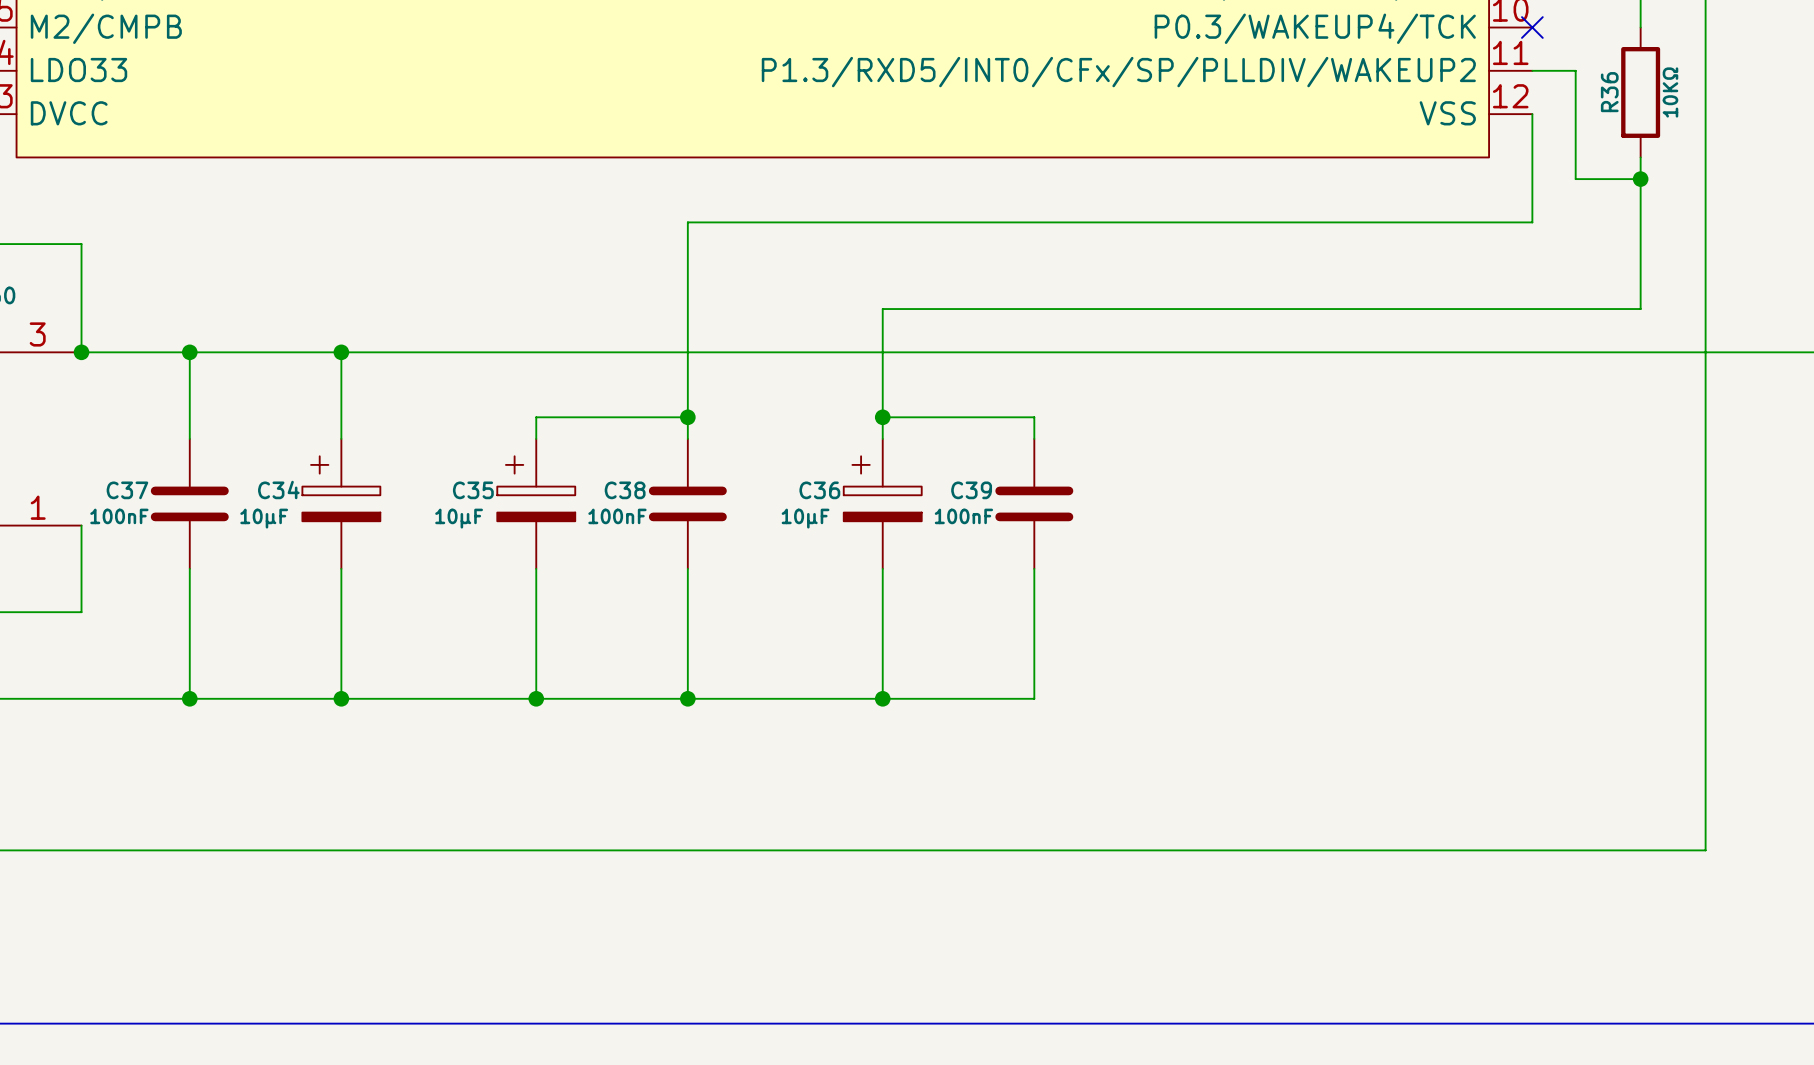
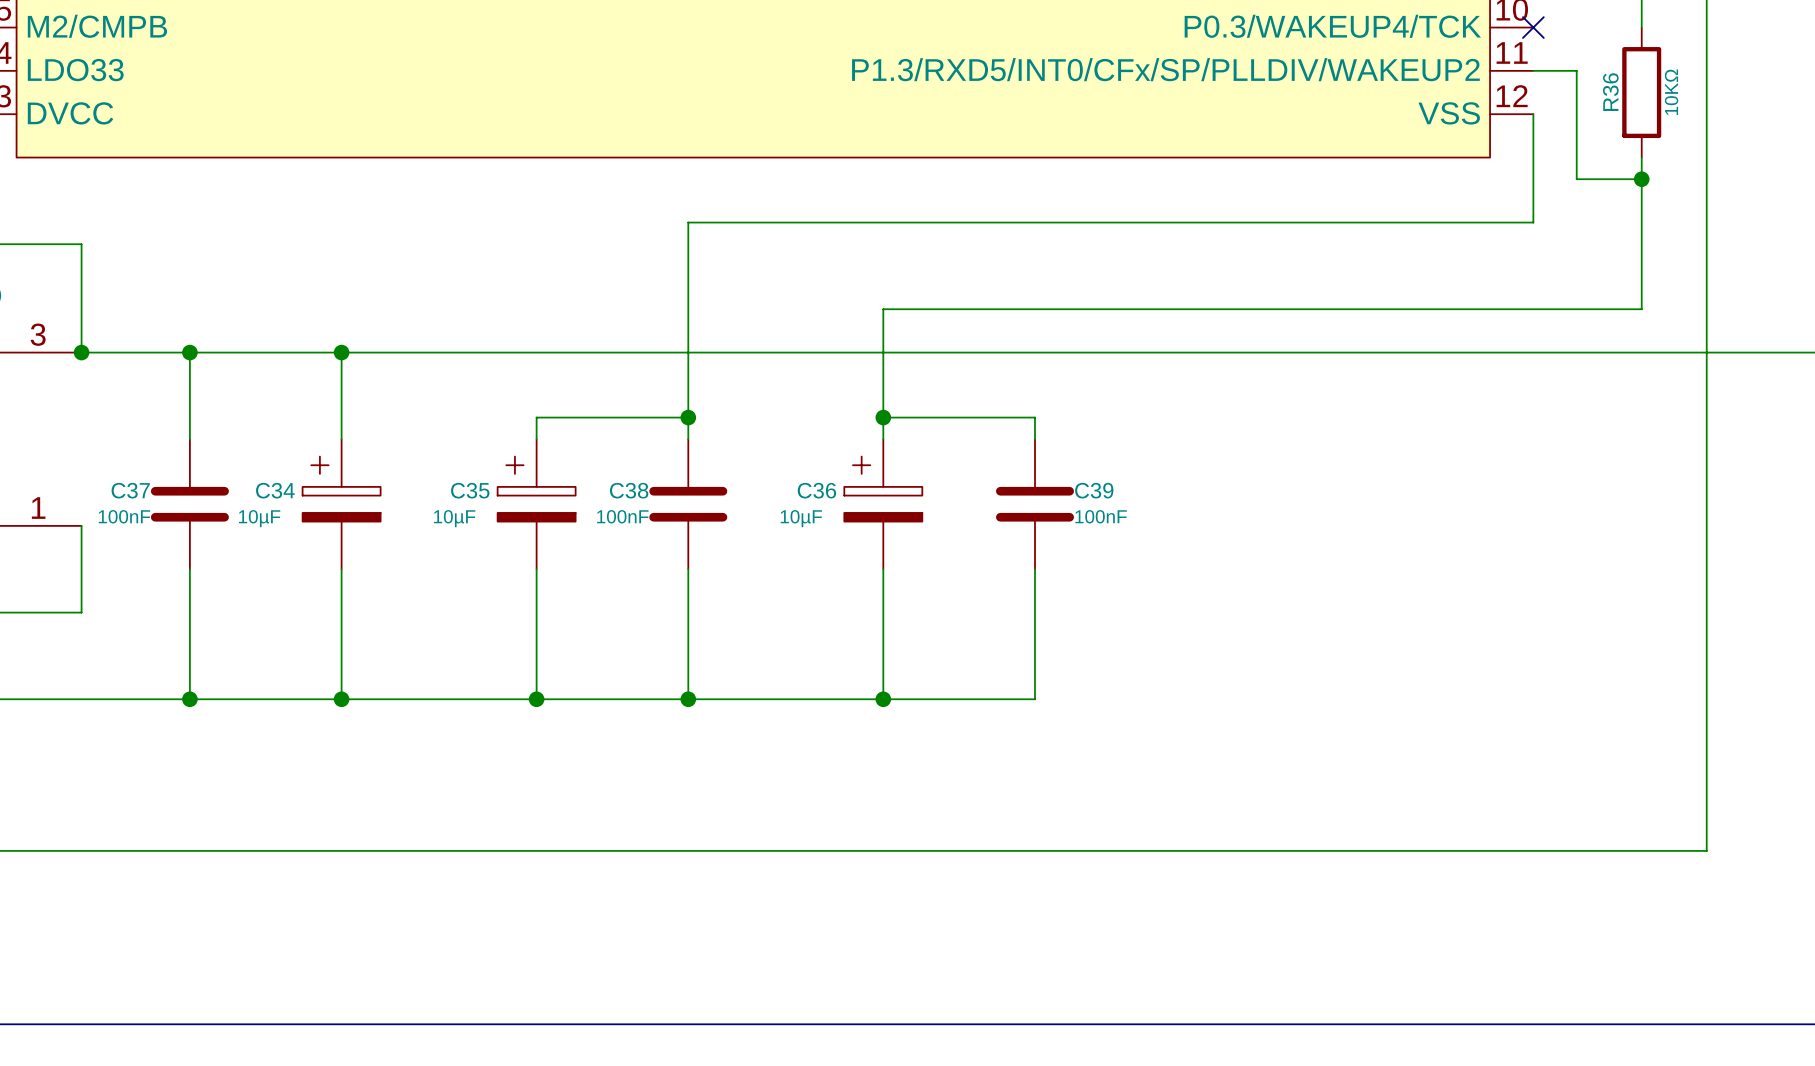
C39 name position: C39 (971, 490) -> C39 (1094, 490)
C39 value position: 100nF (963, 516) -> 100nF (1101, 516)

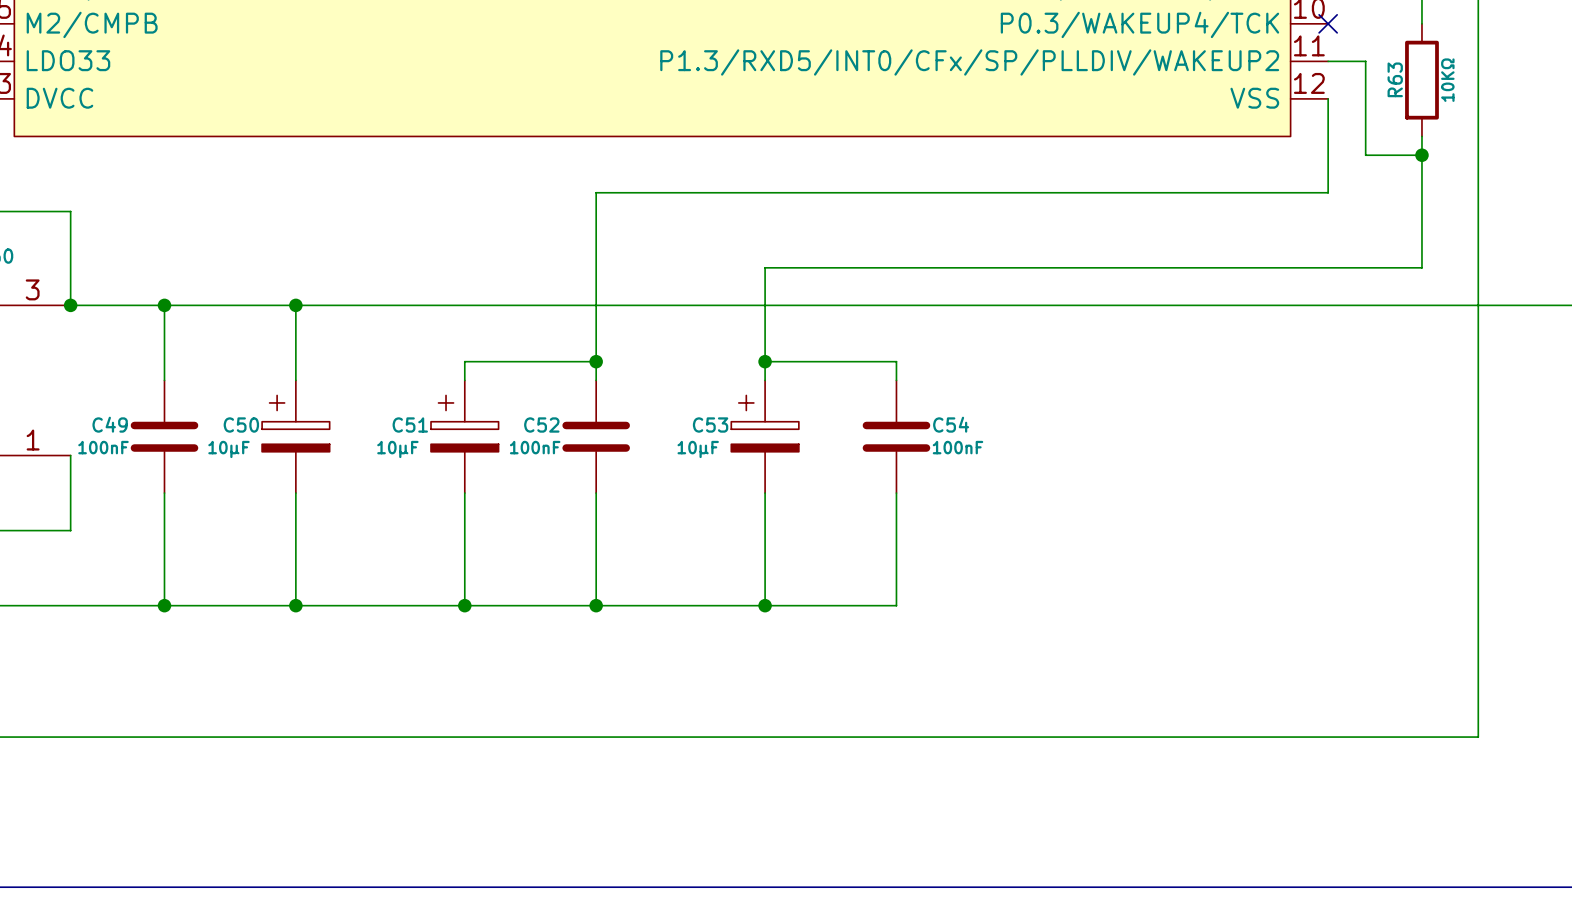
R36 name: R36 (1610, 92) -> R63 (1395, 79)
C37 name: C37 (130, 490) -> C49 (110, 424)
C34 name: C34 (275, 490) -> C50 (241, 425)
C35 name: C35 (470, 490) -> C51 (410, 425)
C38 name: C38 (629, 490) -> C52 (541, 425)
C36 name: C36 (816, 490) -> C53 (710, 425)
C39 name: C39 (1094, 490) -> C54 (951, 424)

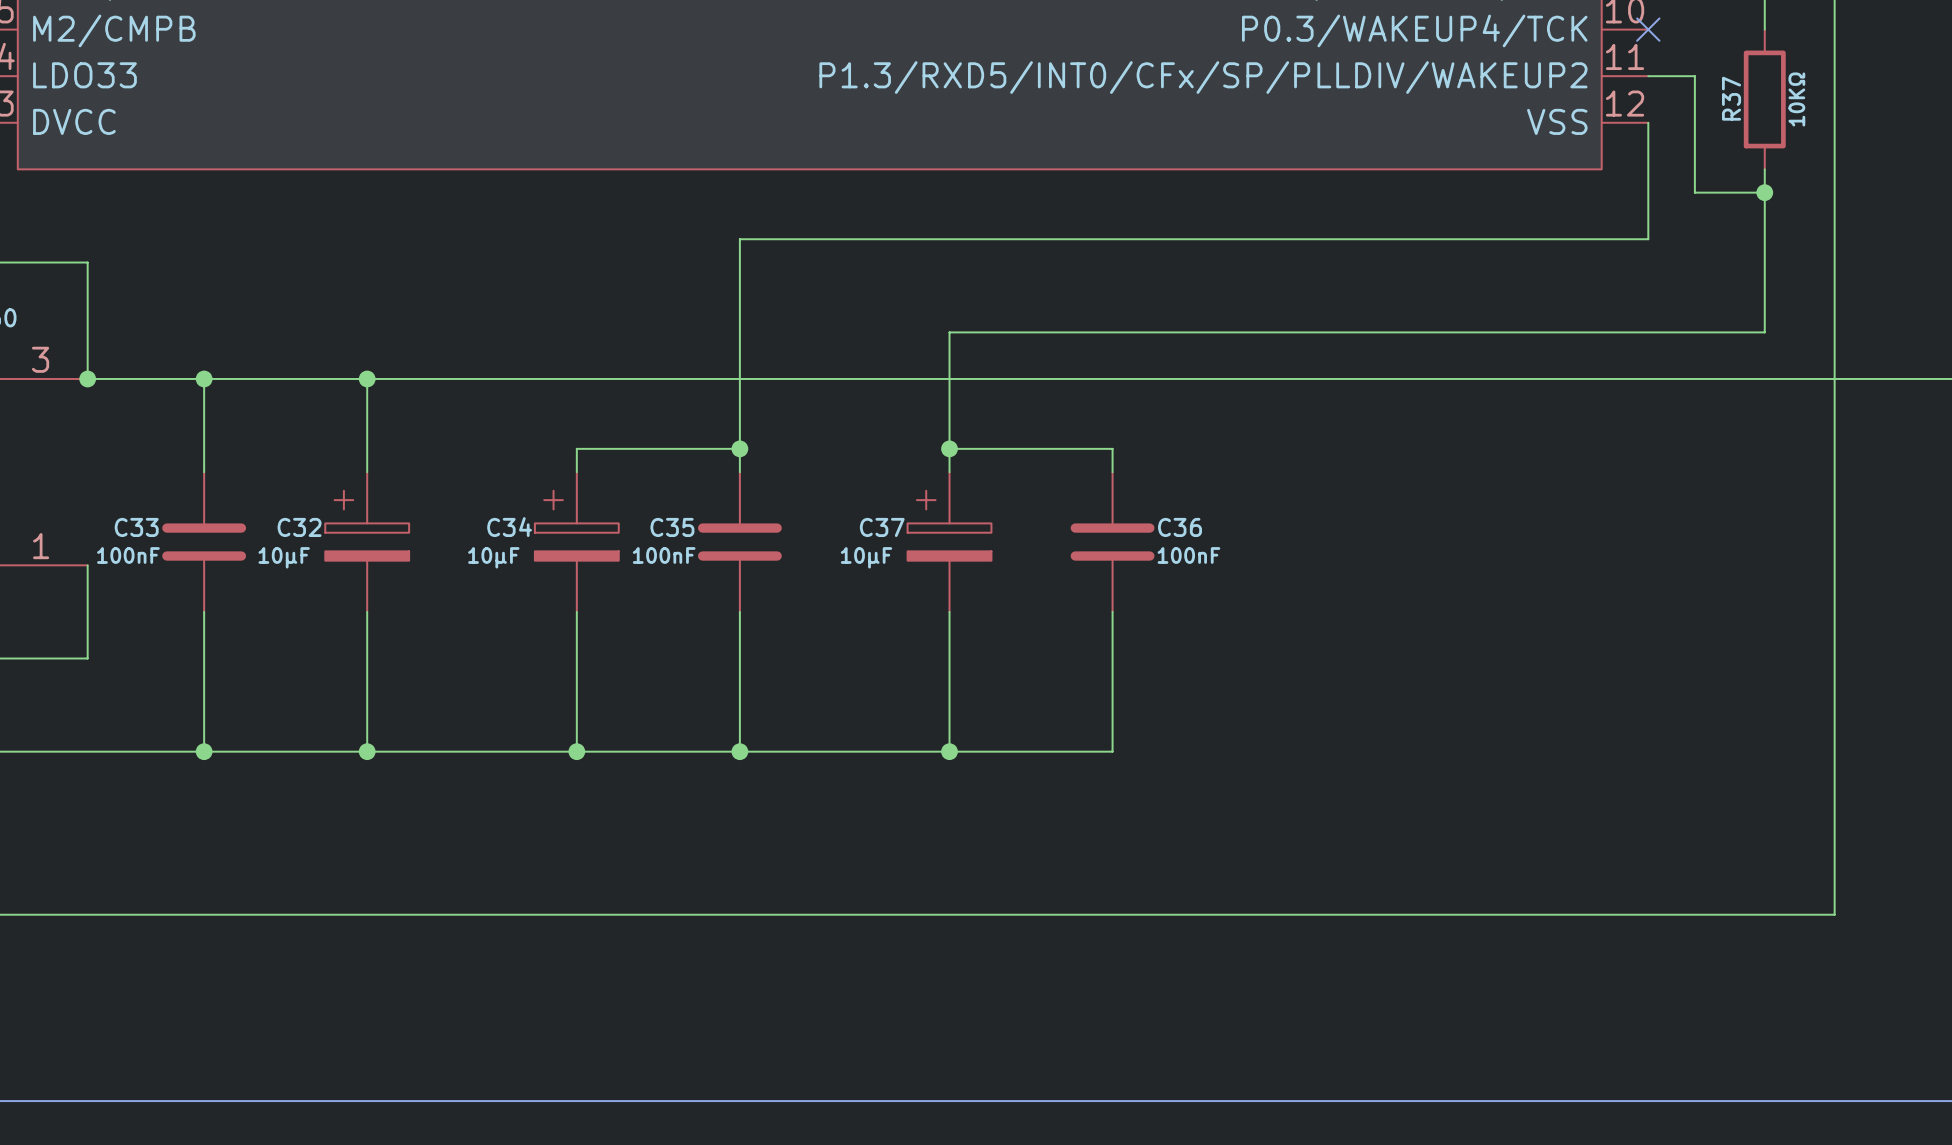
R63 name: R63 (1395, 79) -> R37 (1731, 98)
C49 name: C49 (110, 424) -> C33 (136, 527)
C54 name: C54 (951, 424) -> C36 (1180, 527)
C50 name: C50 (241, 425) -> C32 (299, 527)
C51 name: C51 (410, 425) -> C34 (509, 527)
C52 name: C52 (541, 425) -> C35 (672, 527)
C53 name: C53 (710, 425) -> C37 (882, 527)

